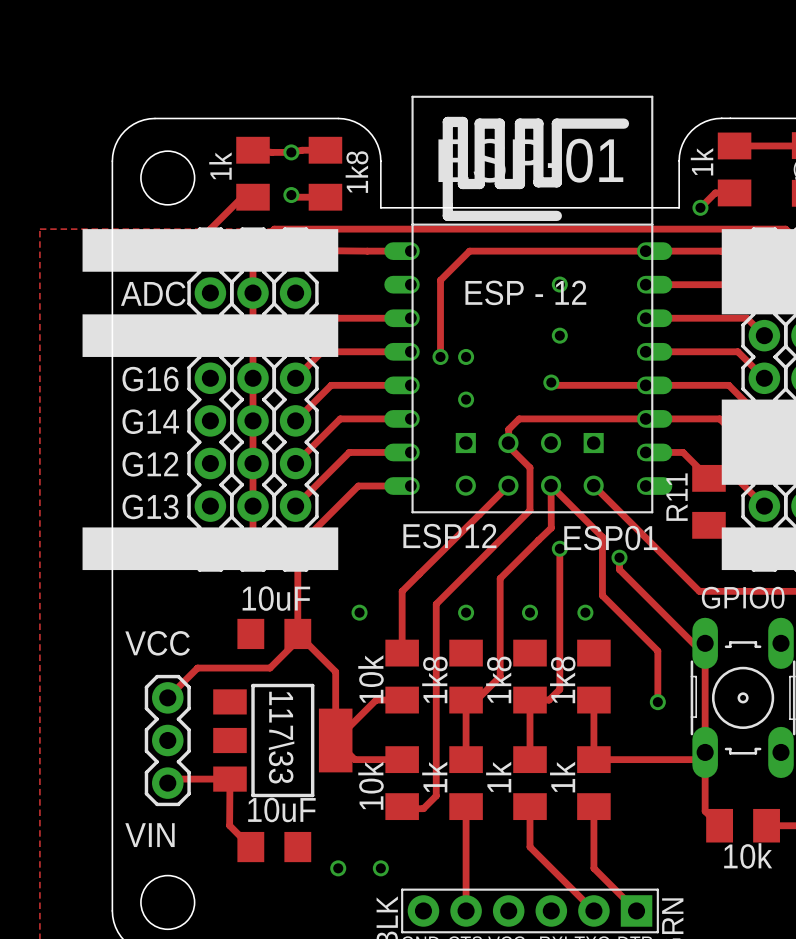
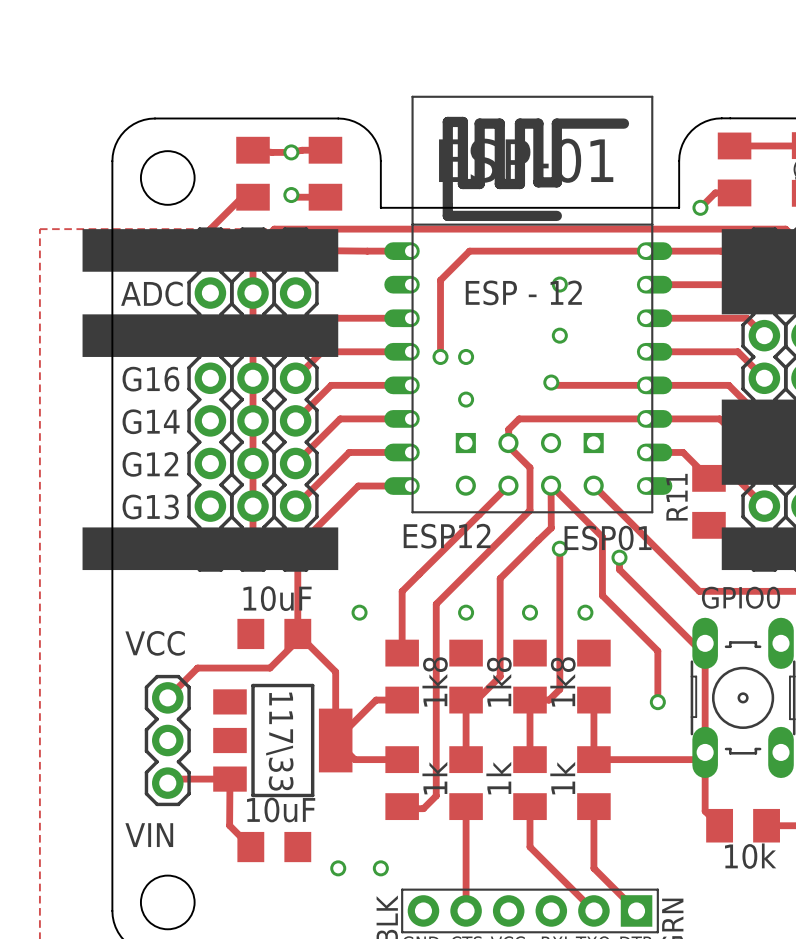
part value: 1k (702, 161) -> none
part value: 1k (220, 166) -> none
part value: 1k8 (356, 172) -> none
part value: 10k (371, 679) -> none
part value: 10k (371, 785) -> none

